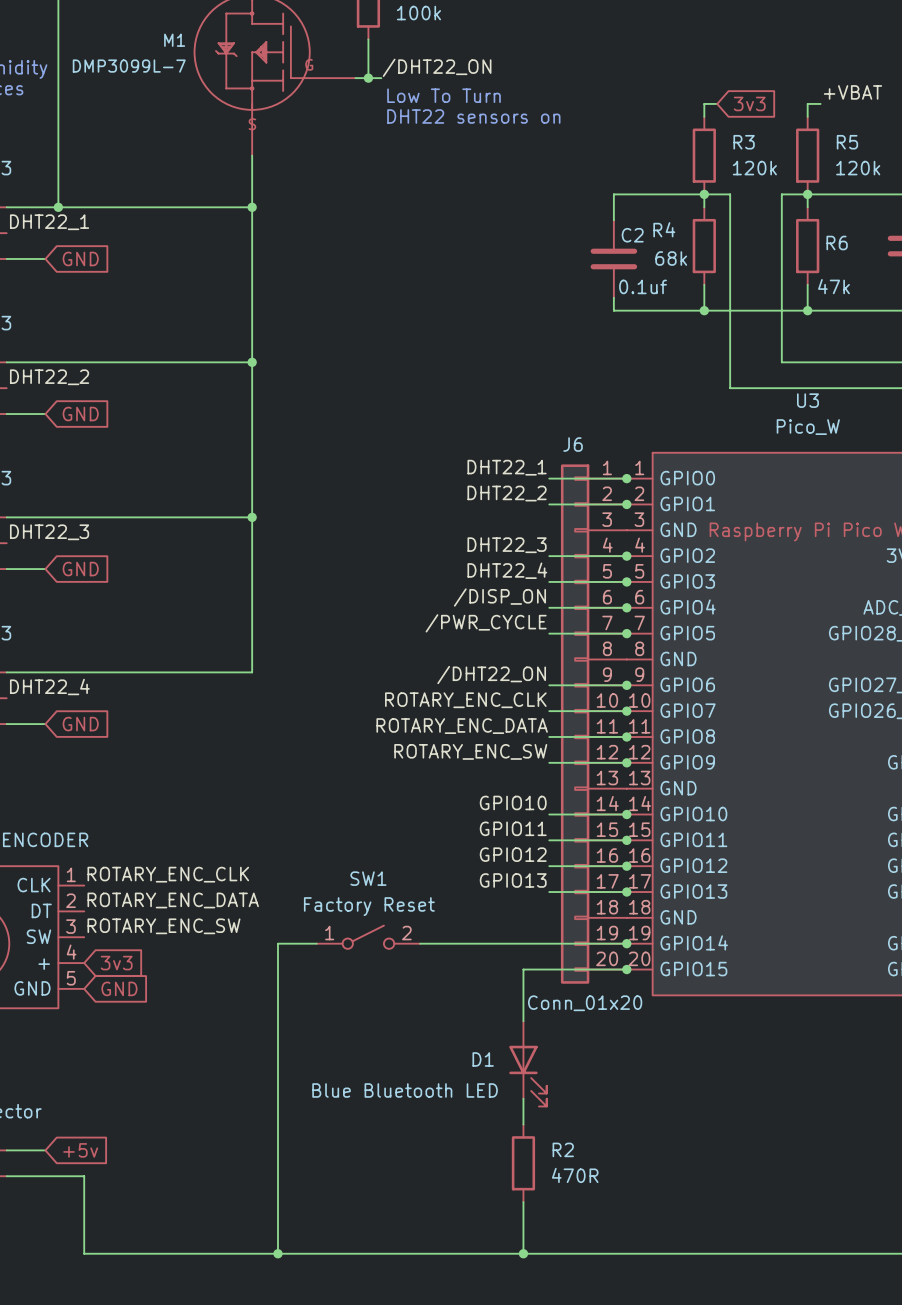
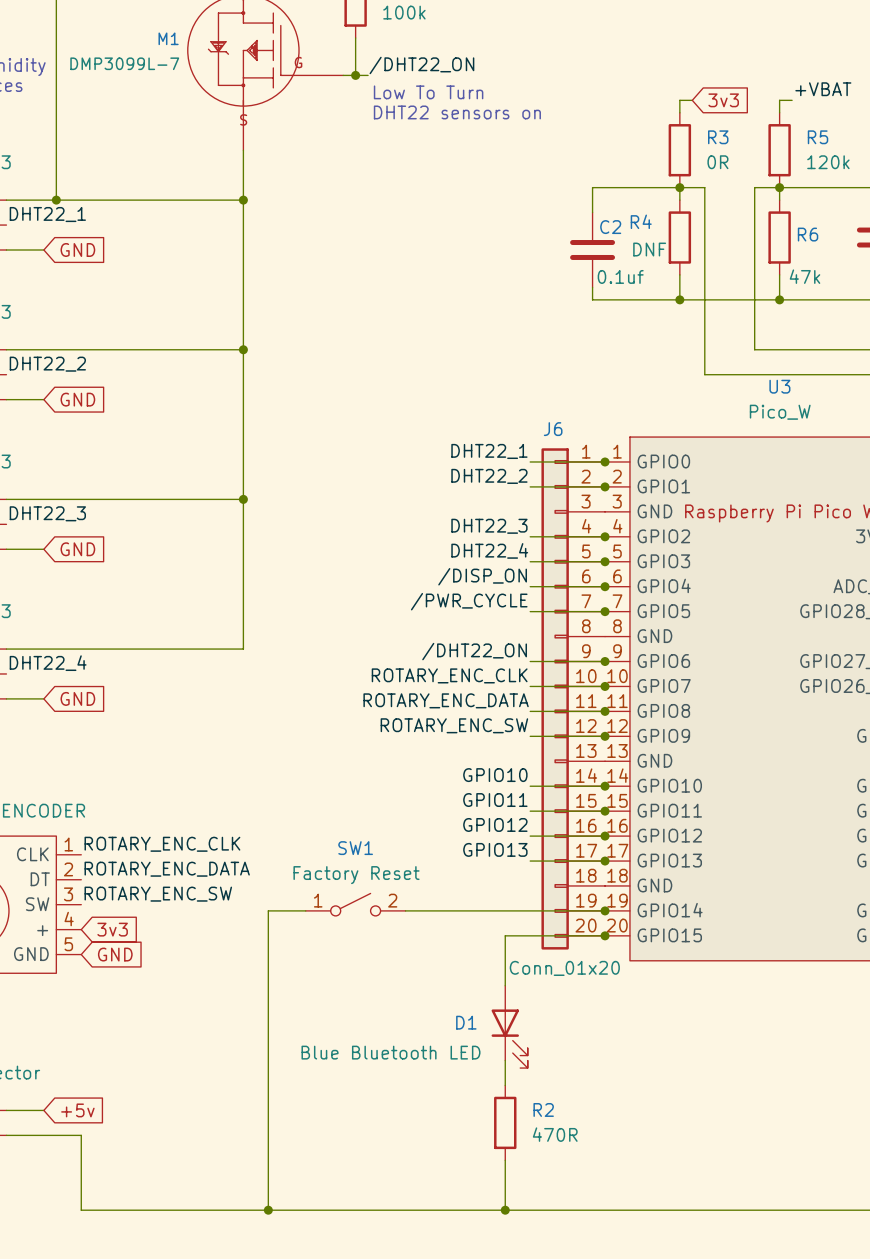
R3 value: 120k (754, 168) -> 0R (717, 162)
R4 value: 68k (671, 258) -> DNF (649, 249)

